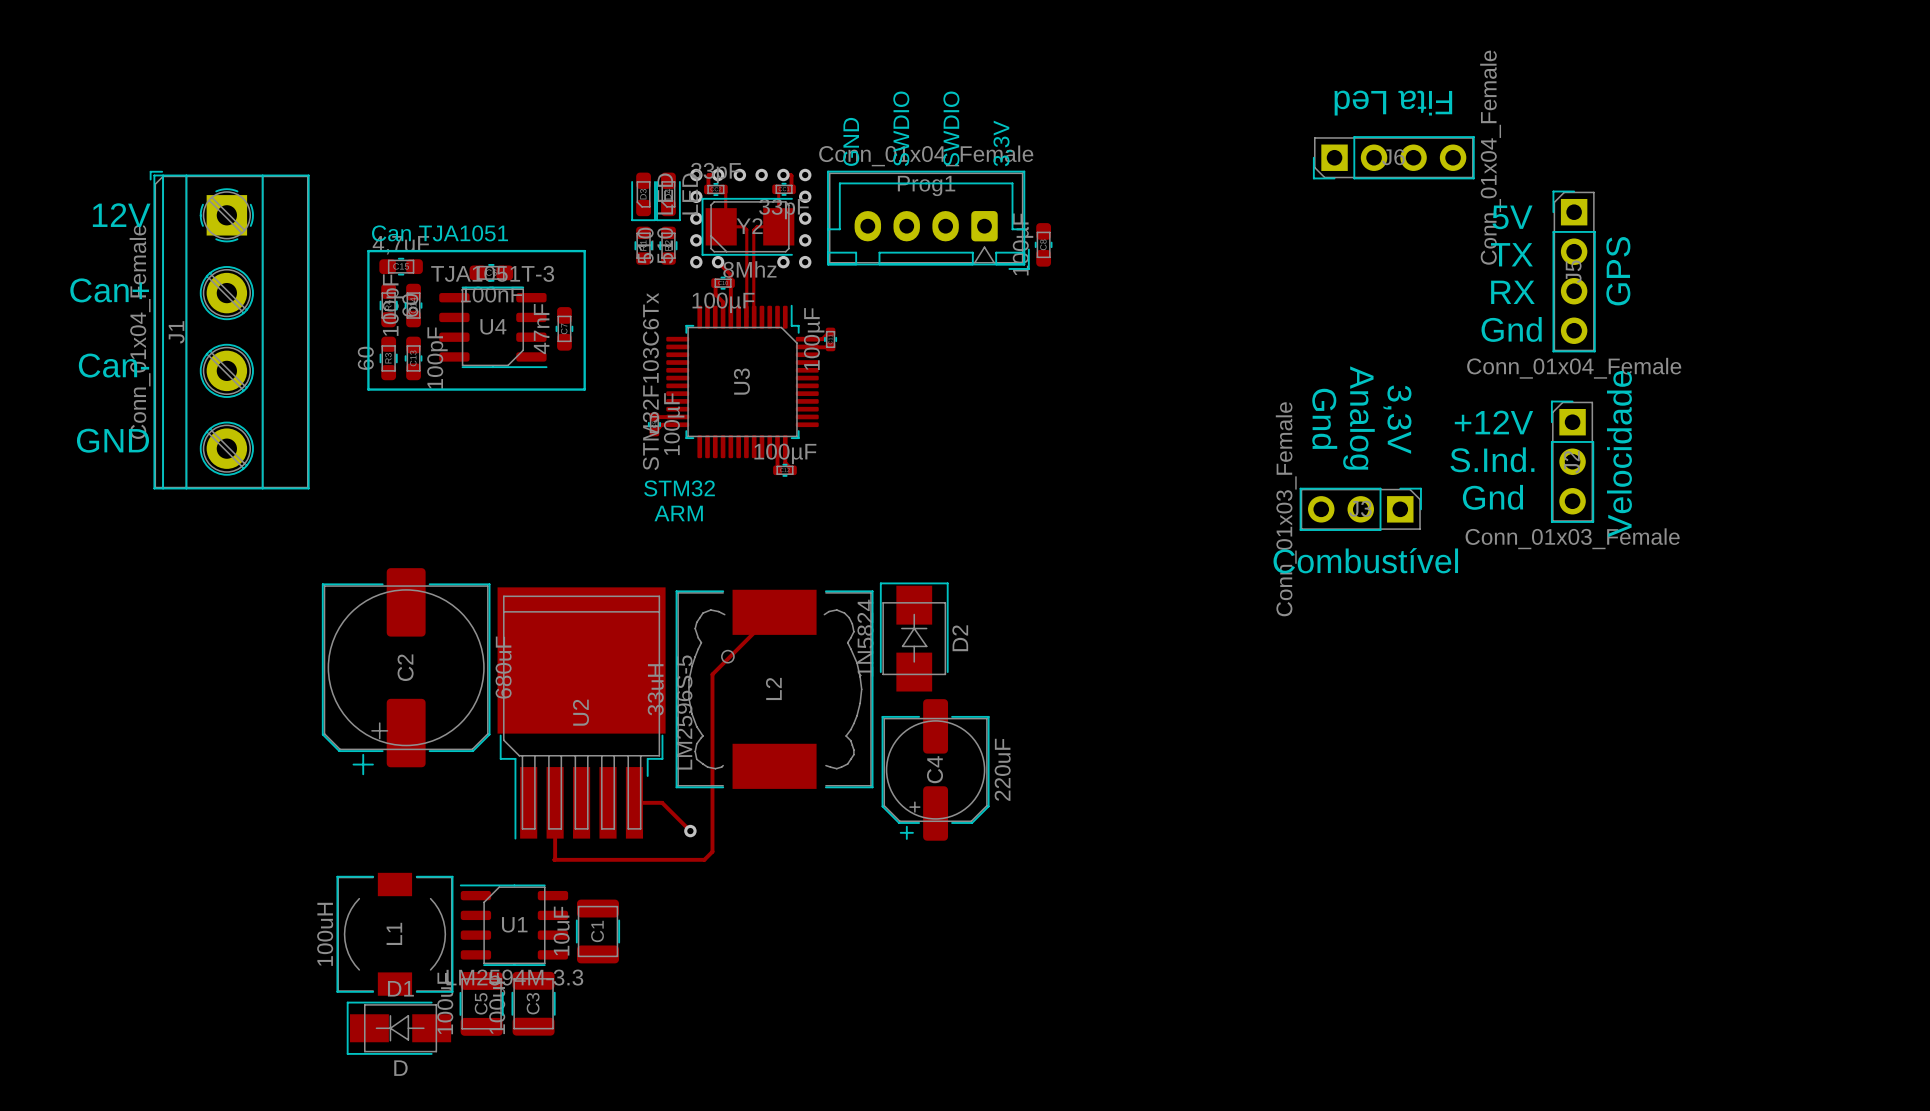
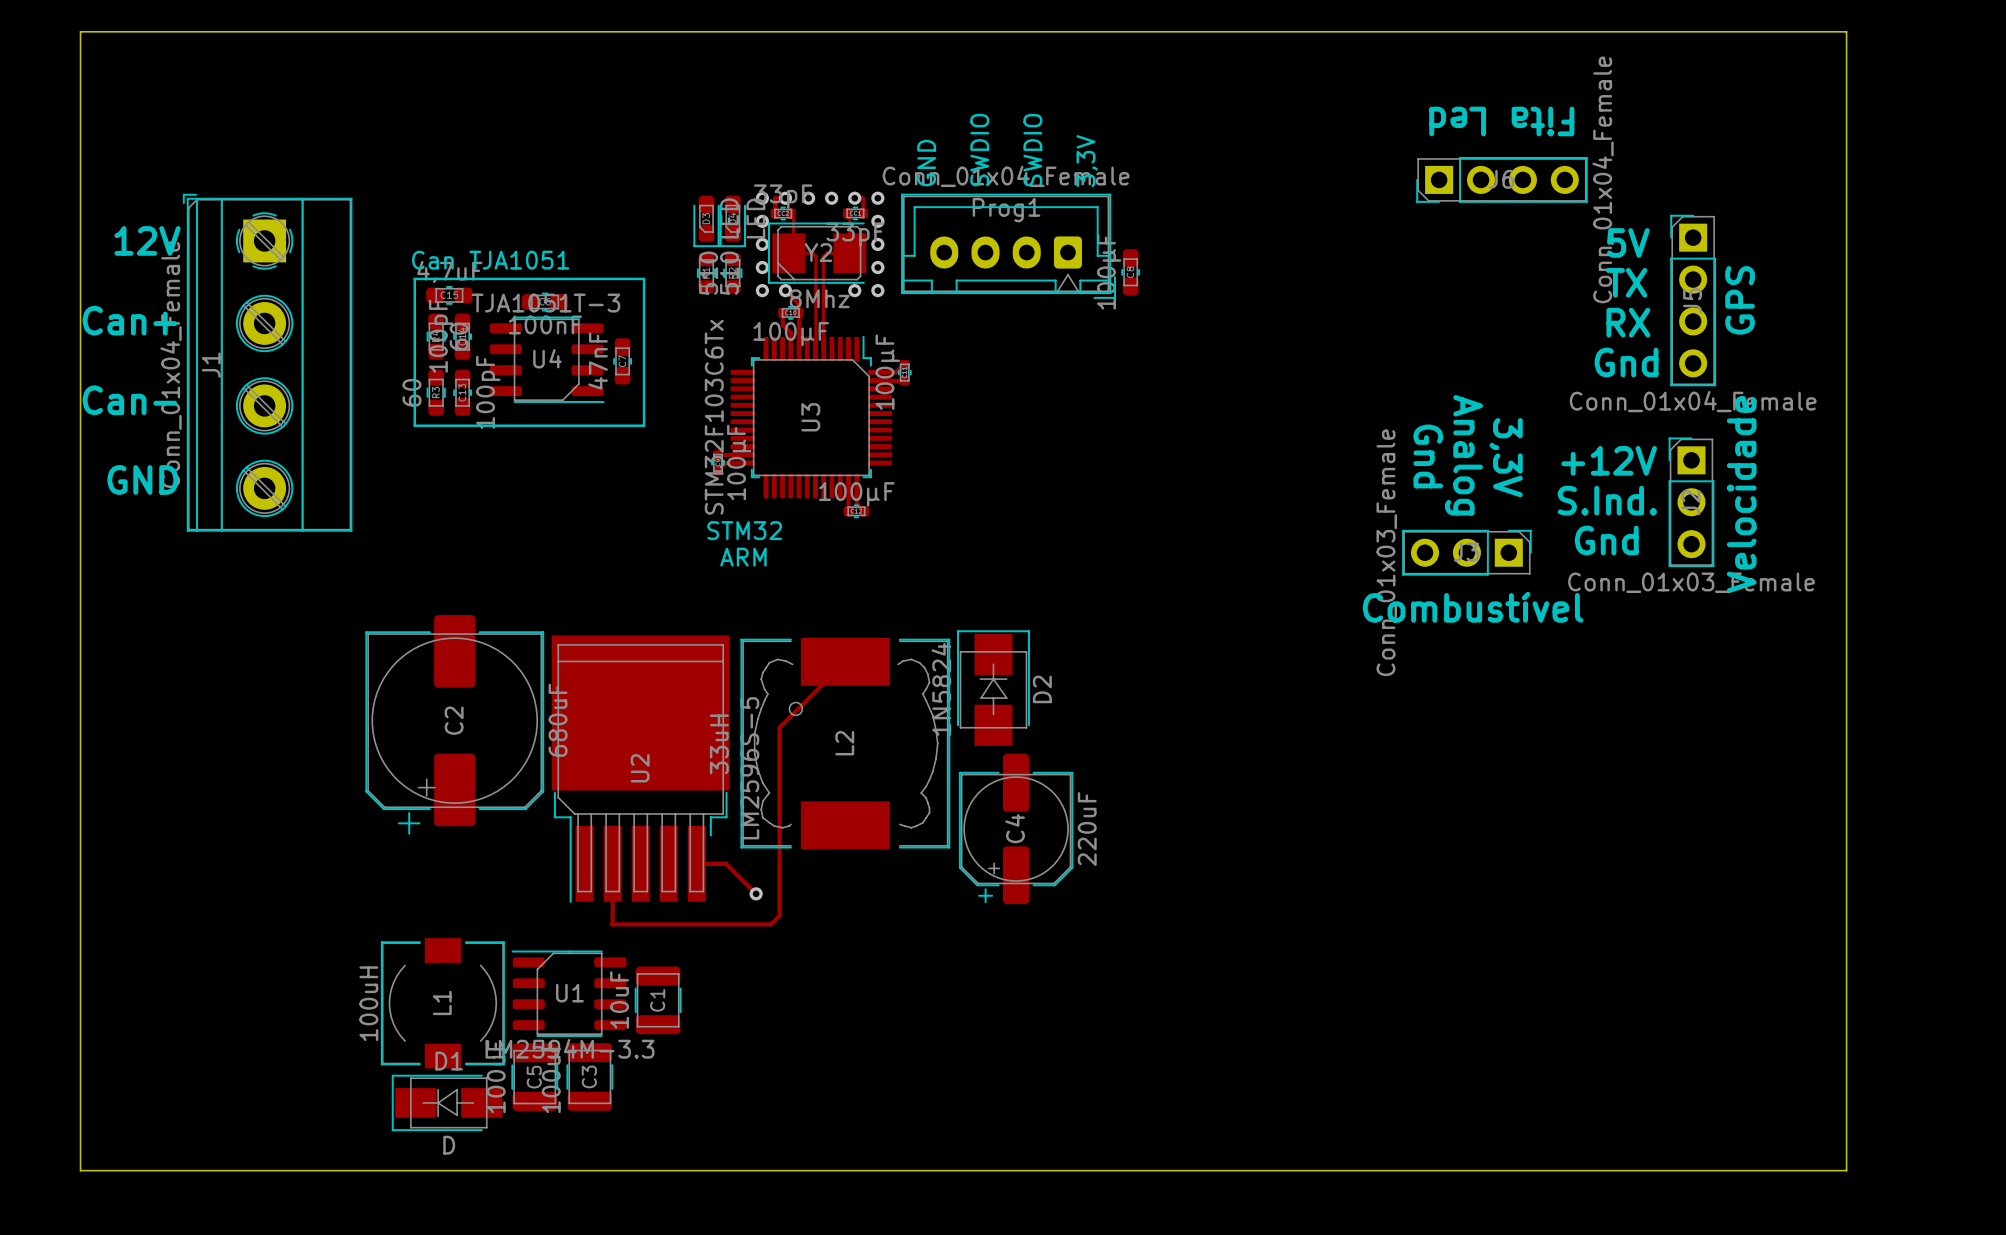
board edge: none -> (80, 31) (1846, 31) (1846, 1170) (80, 1170) (80, 31)

